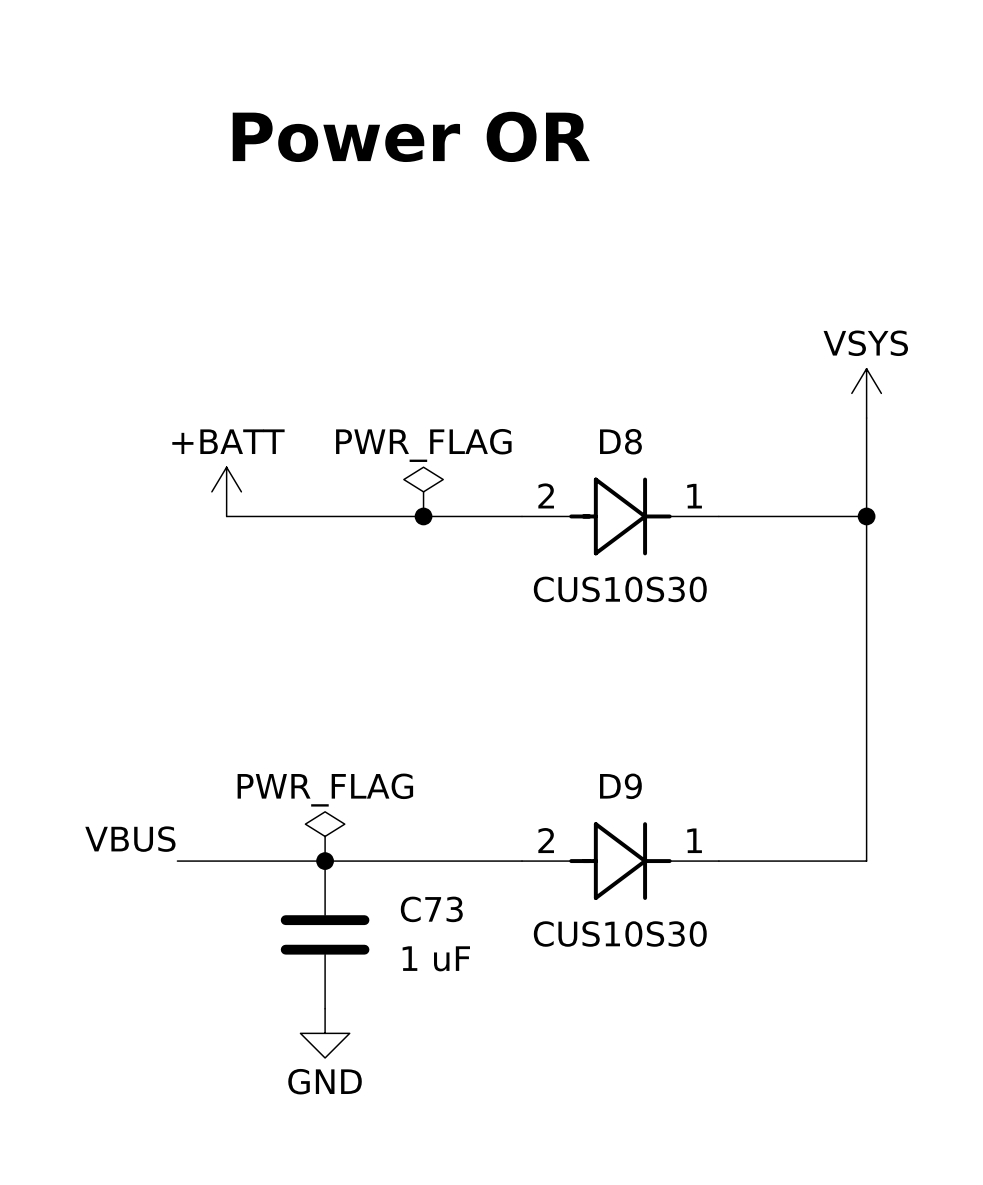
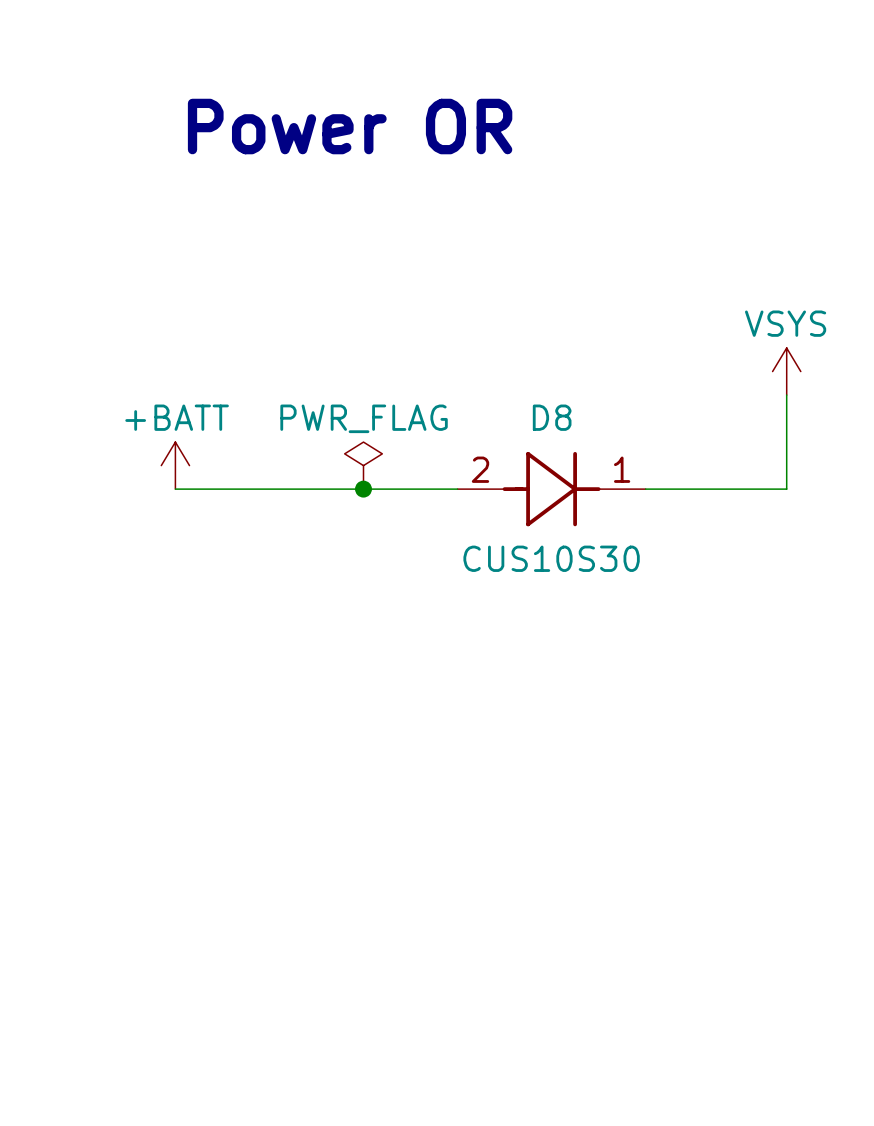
wire: (866, 516) (866, 861) (718, 861) -> none
junction: (866, 516) -> none
power symbol: PWR_FLAG (325, 836) -> none
label: VBUS (130, 839) -> none
wire: (177, 861) (522, 861) -> none
junction: (325, 861) -> none
D9: CUS10S30 (620, 861) -> none
C73: 1 uF (325, 934) -> none
power symbol: GND (325, 1033) -> none

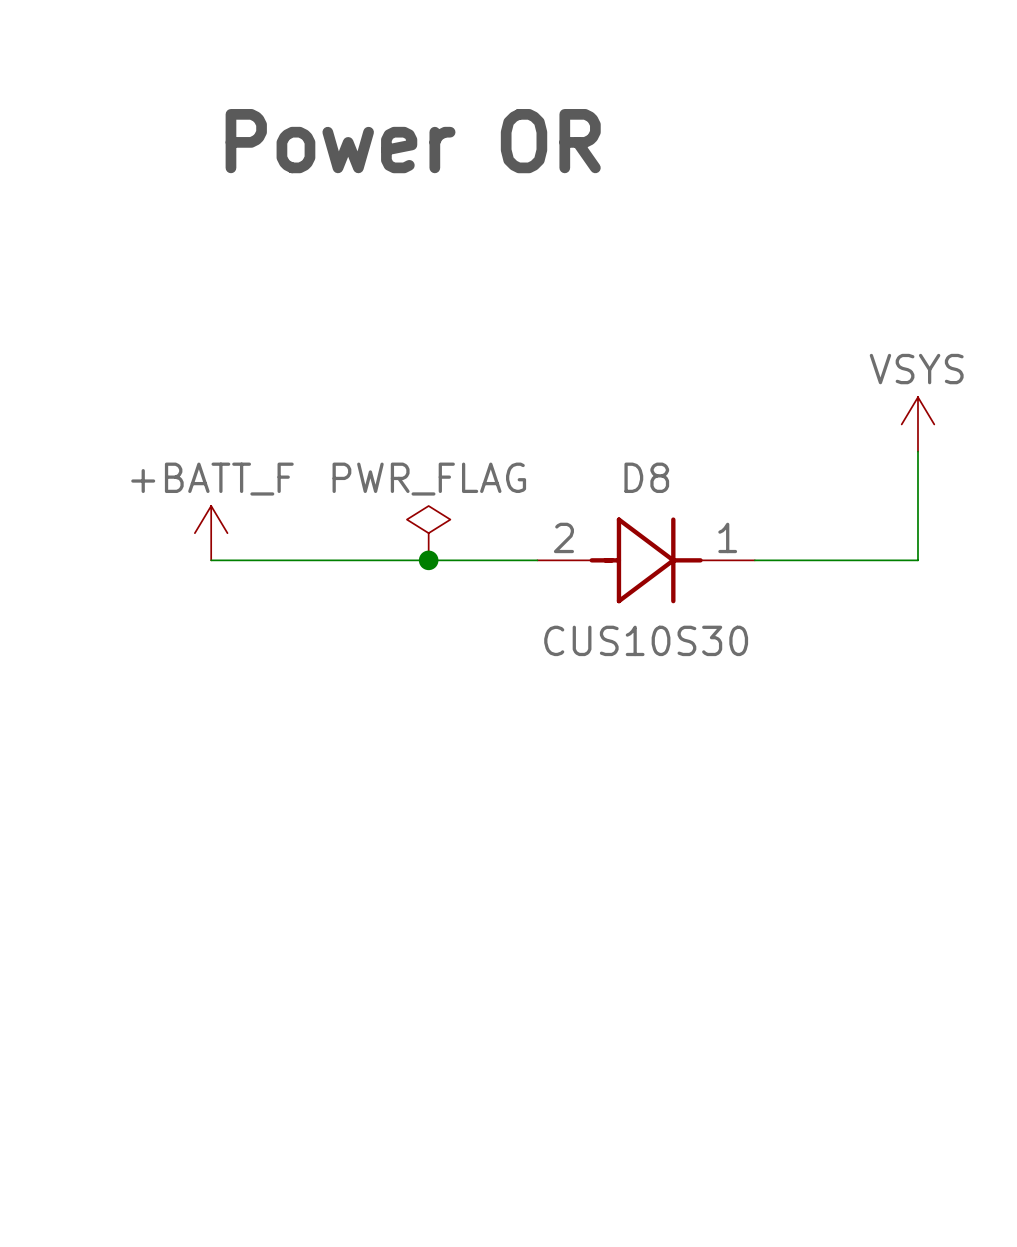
power symbol: +BATT (175, 465) -> +BATT_F (211, 533)

